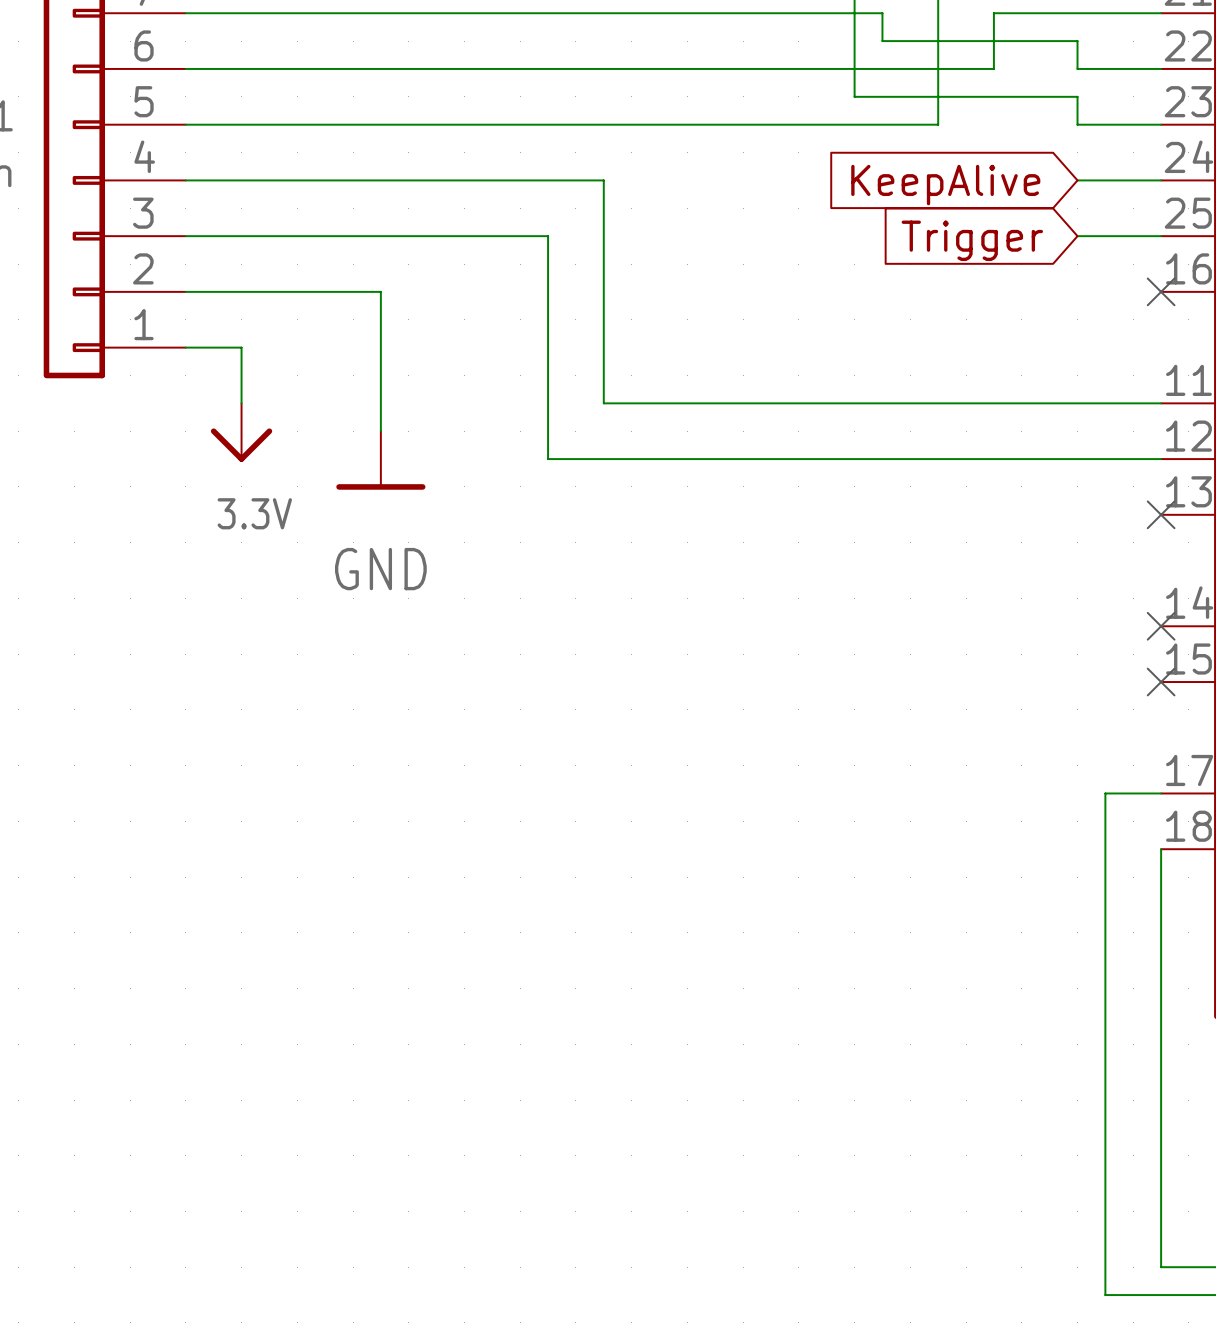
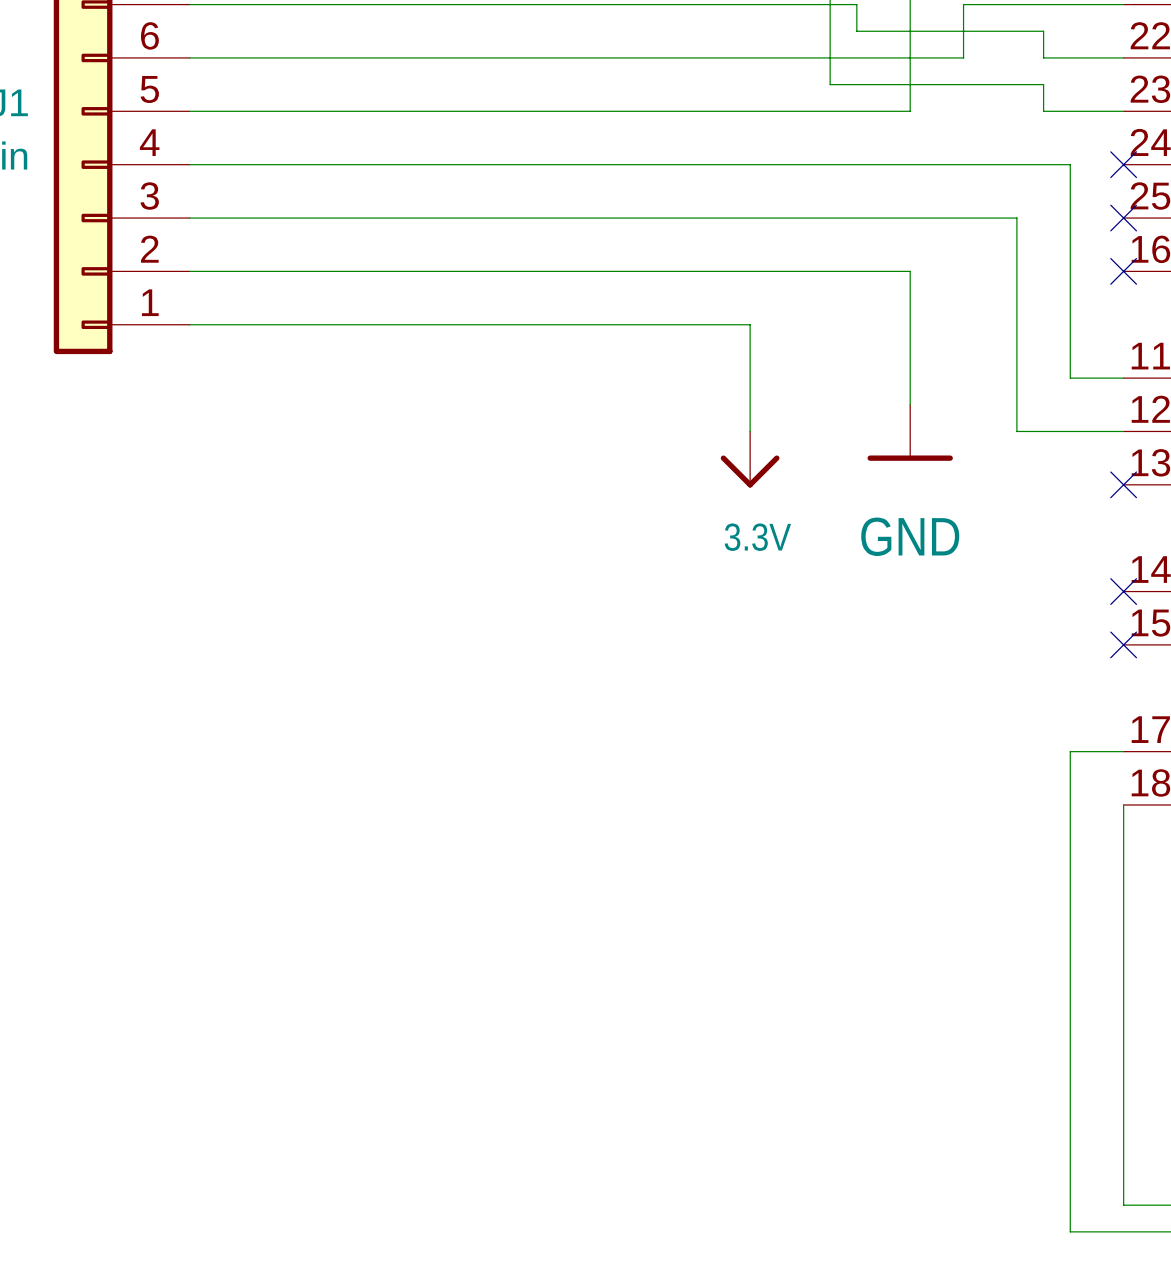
wire: (603, 180) (603, 403) (1105, 403) -> (590, 164) (1043, 164)
wire: (1105, 180) (1161, 180) -> (1070, 164) (1070, 378)
no-connect mark: none -> (1123, 164)
global label: KeepAlive (945, 185) -> none
wire: (548, 236) (548, 459) (1049, 459) -> (536, 218) (1016, 218) (1016, 431)
wire: (1077, 236) (1161, 236) -> none
no-connect mark: none -> (1123, 218)
global label: Trigger (972, 240) -> none
wire: (380, 291) (380, 431) -> (376, 271) (910, 271) (910, 404)
wire: (241, 347) (241, 403) -> (243, 324) (750, 324) (750, 431)
power symbol position: 3.3V (241, 432) -> 3.3V (750, 459)
power symbol: GND (380, 460) -> none
power symbol: none -> GND (910, 432)

